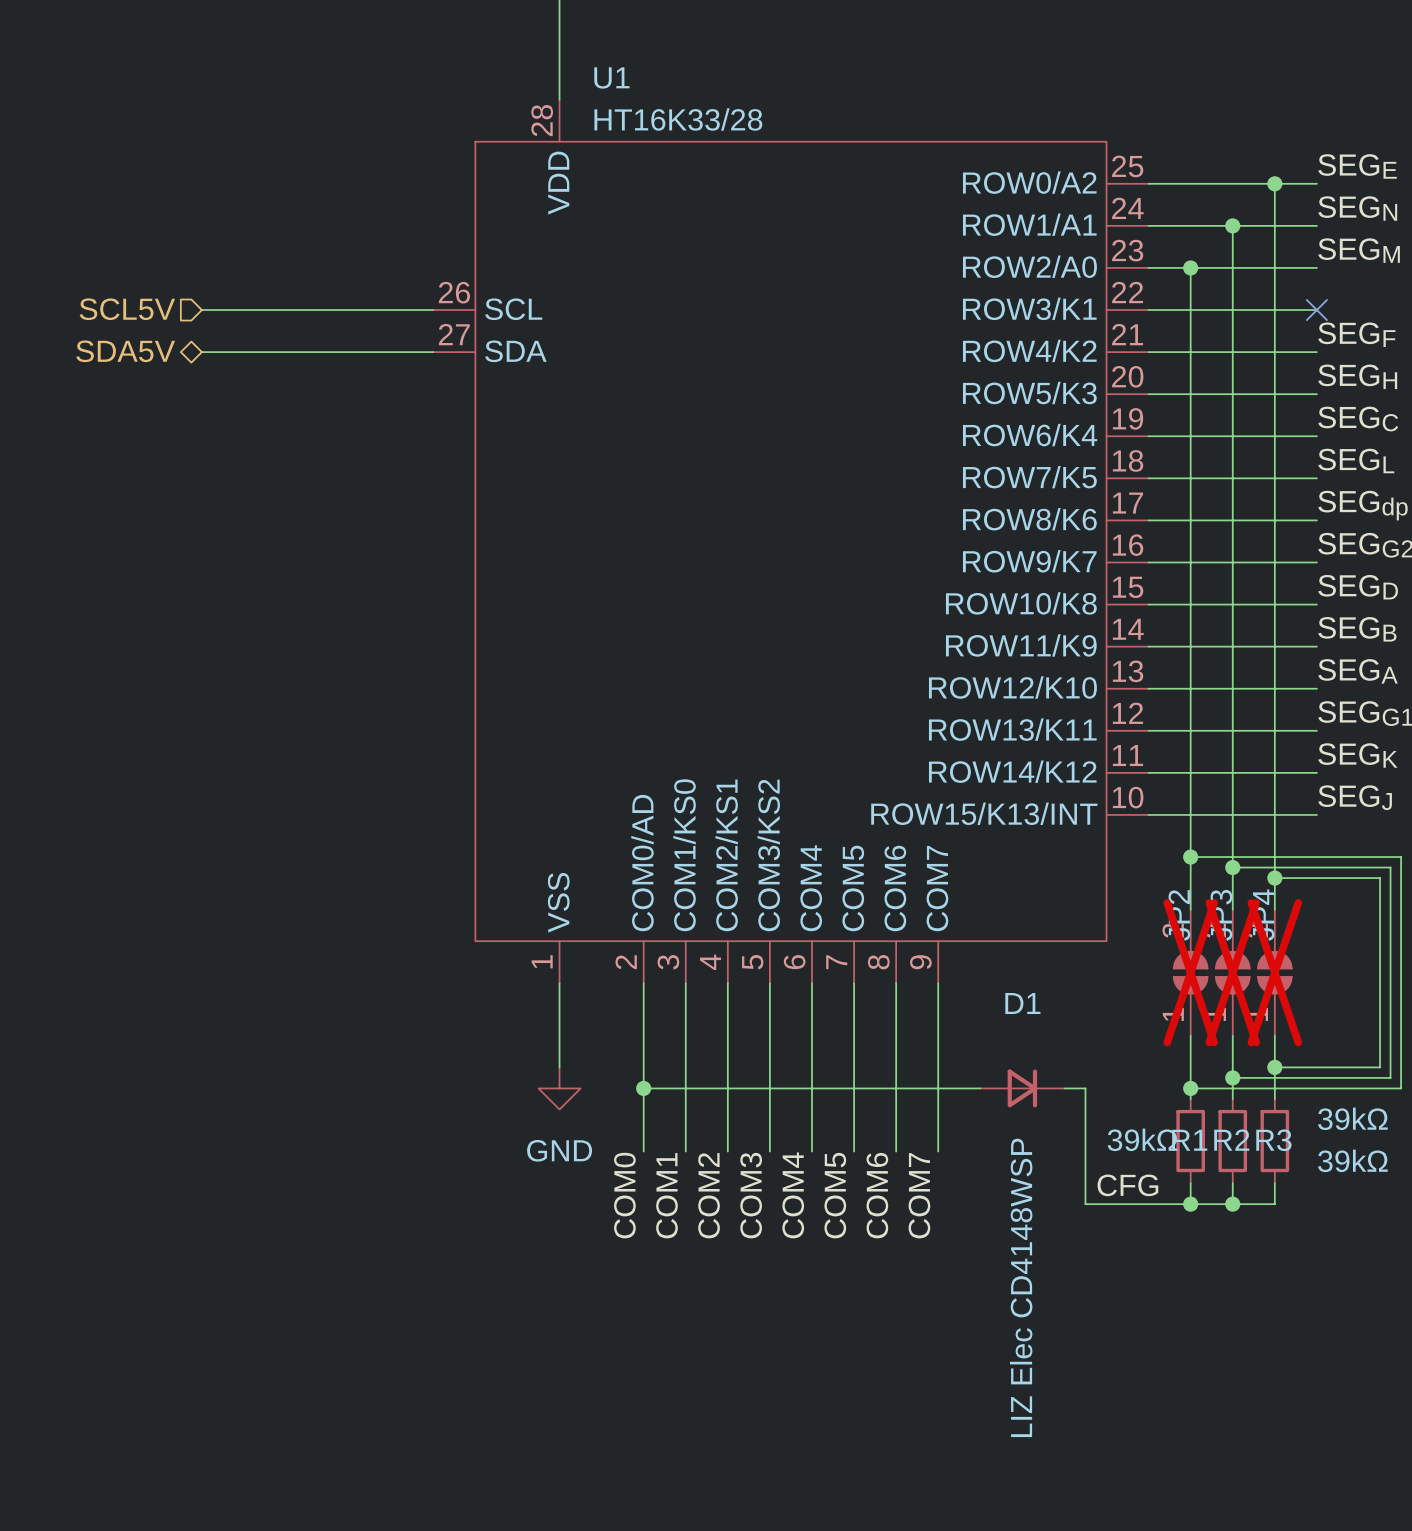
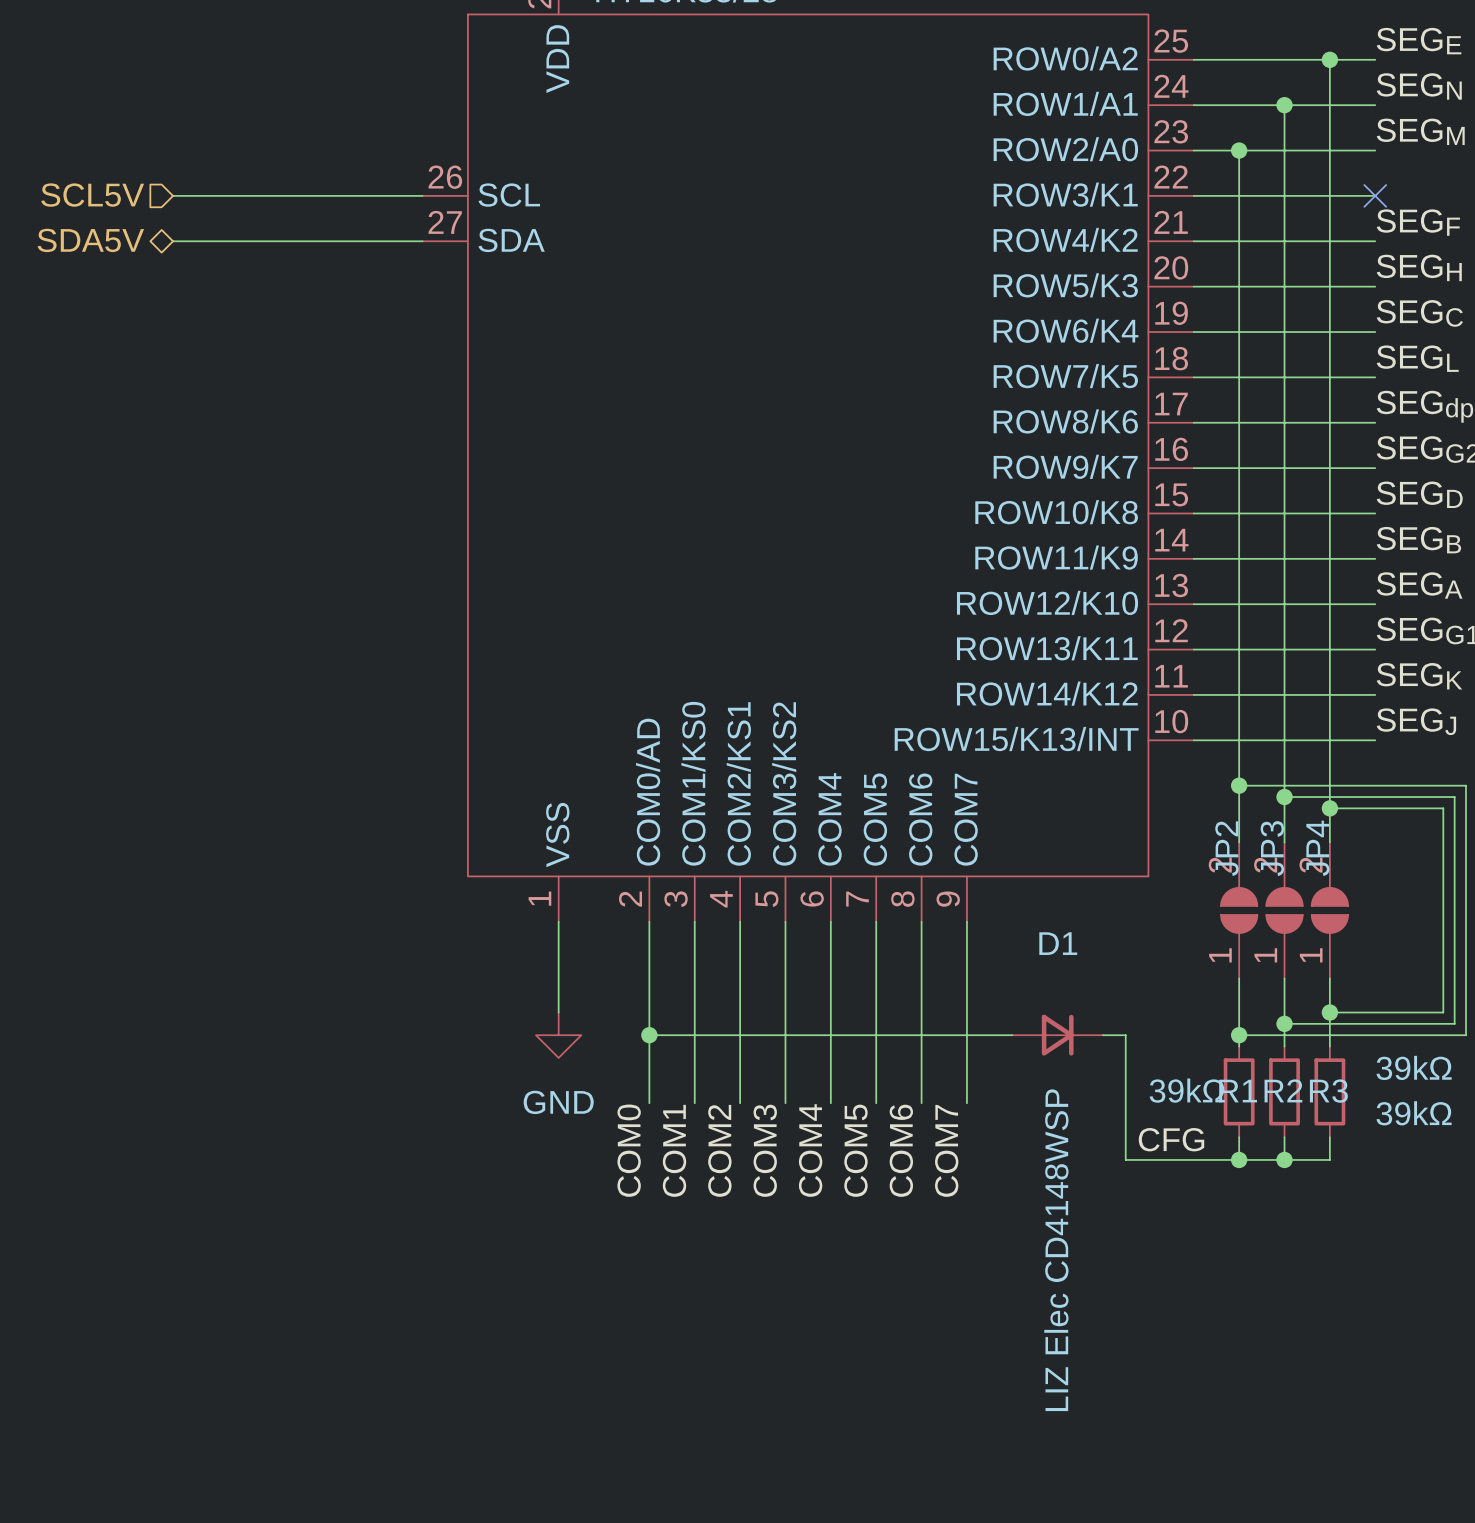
JP2 do-not-place cross: (1190, 972) -> none
JP3 do-not-place cross: (1232, 972) -> none
JP4 do-not-place cross: (1274, 972) -> none

